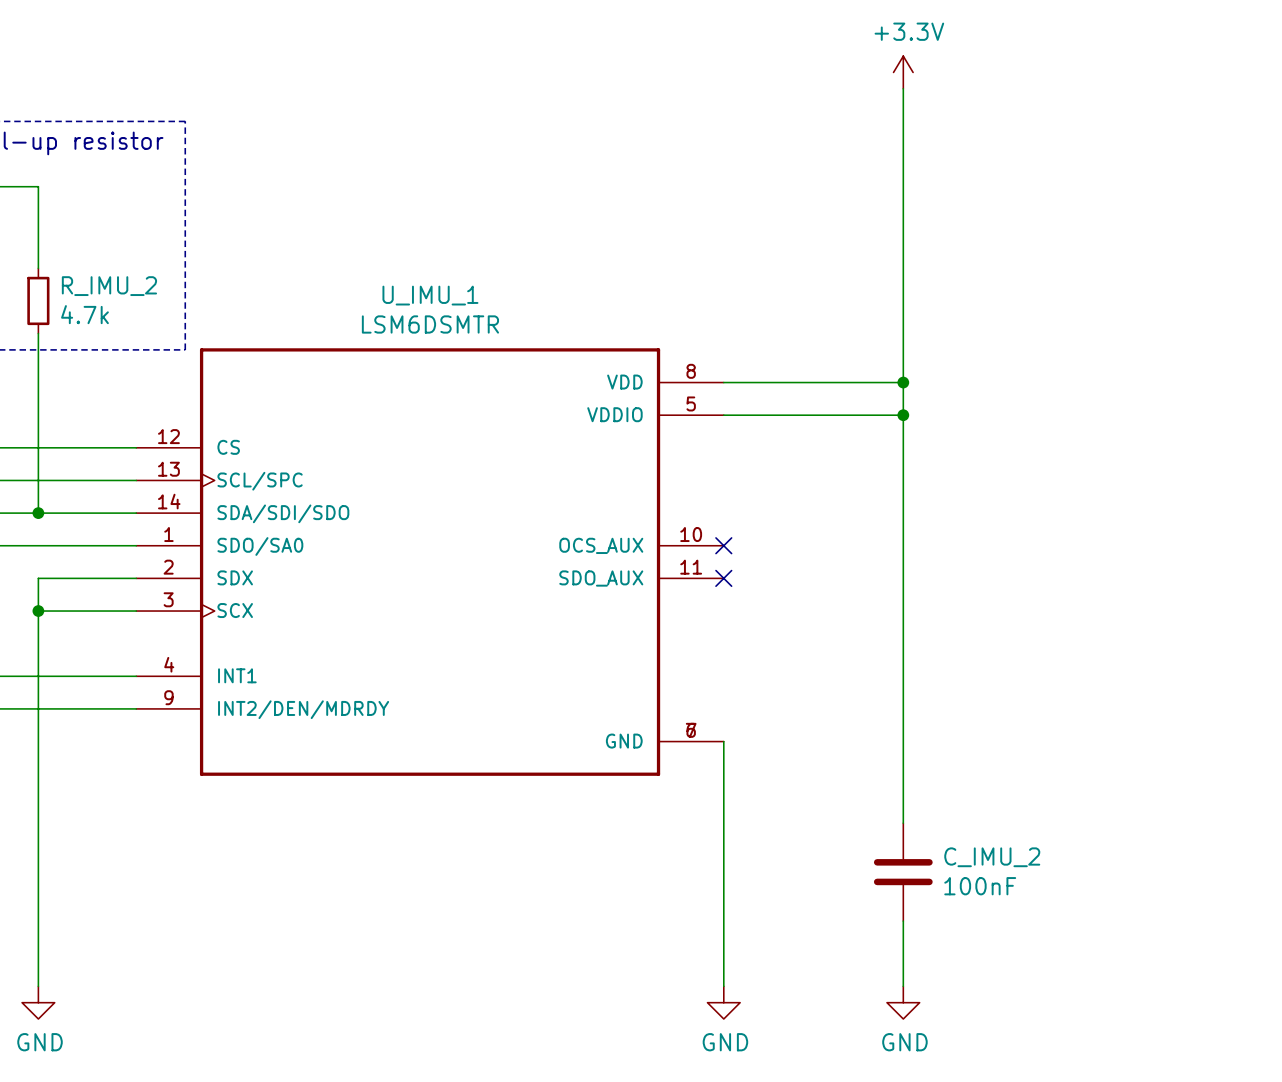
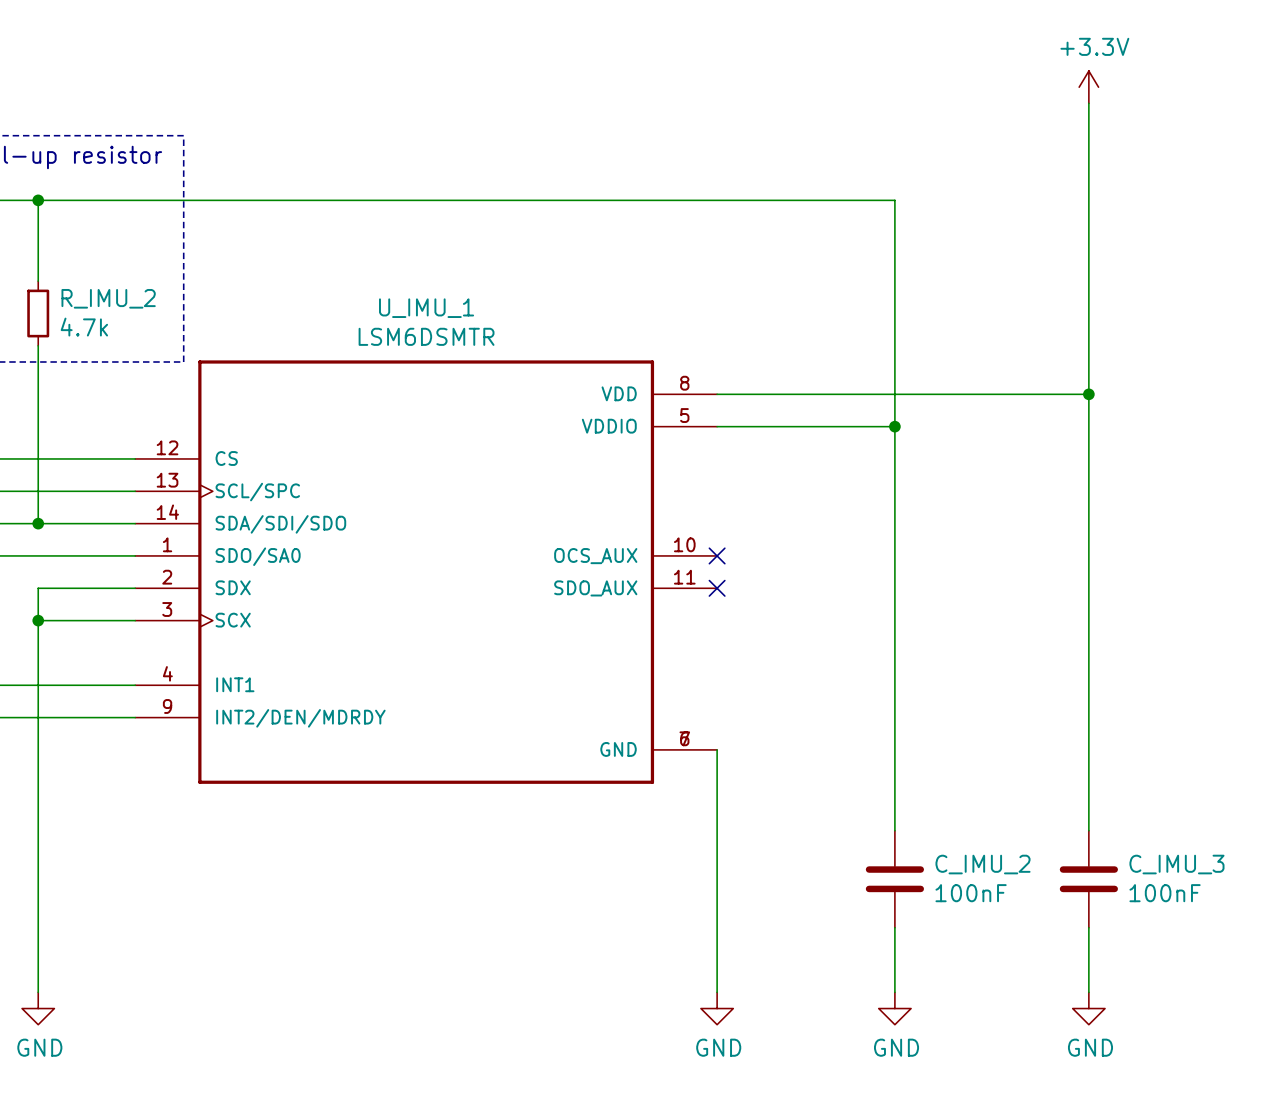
power symbol position: +3.3V (903, 72) -> +3.3V (1088, 87)
wire: (903, 88) (903, 186) -> (38, 200) (894, 200)
wire: none -> (1088, 103) (1088, 830)
junction: none -> (38, 200)
wire: none -> (894, 394) (1088, 394)
junction: (903, 382) -> none
junction: none -> (1088, 394)
C_IMU_3: none -> 100nF (1088, 879)
wire: none -> (1088, 927) (1088, 992)
power symbol: none -> GND (1088, 1008)

